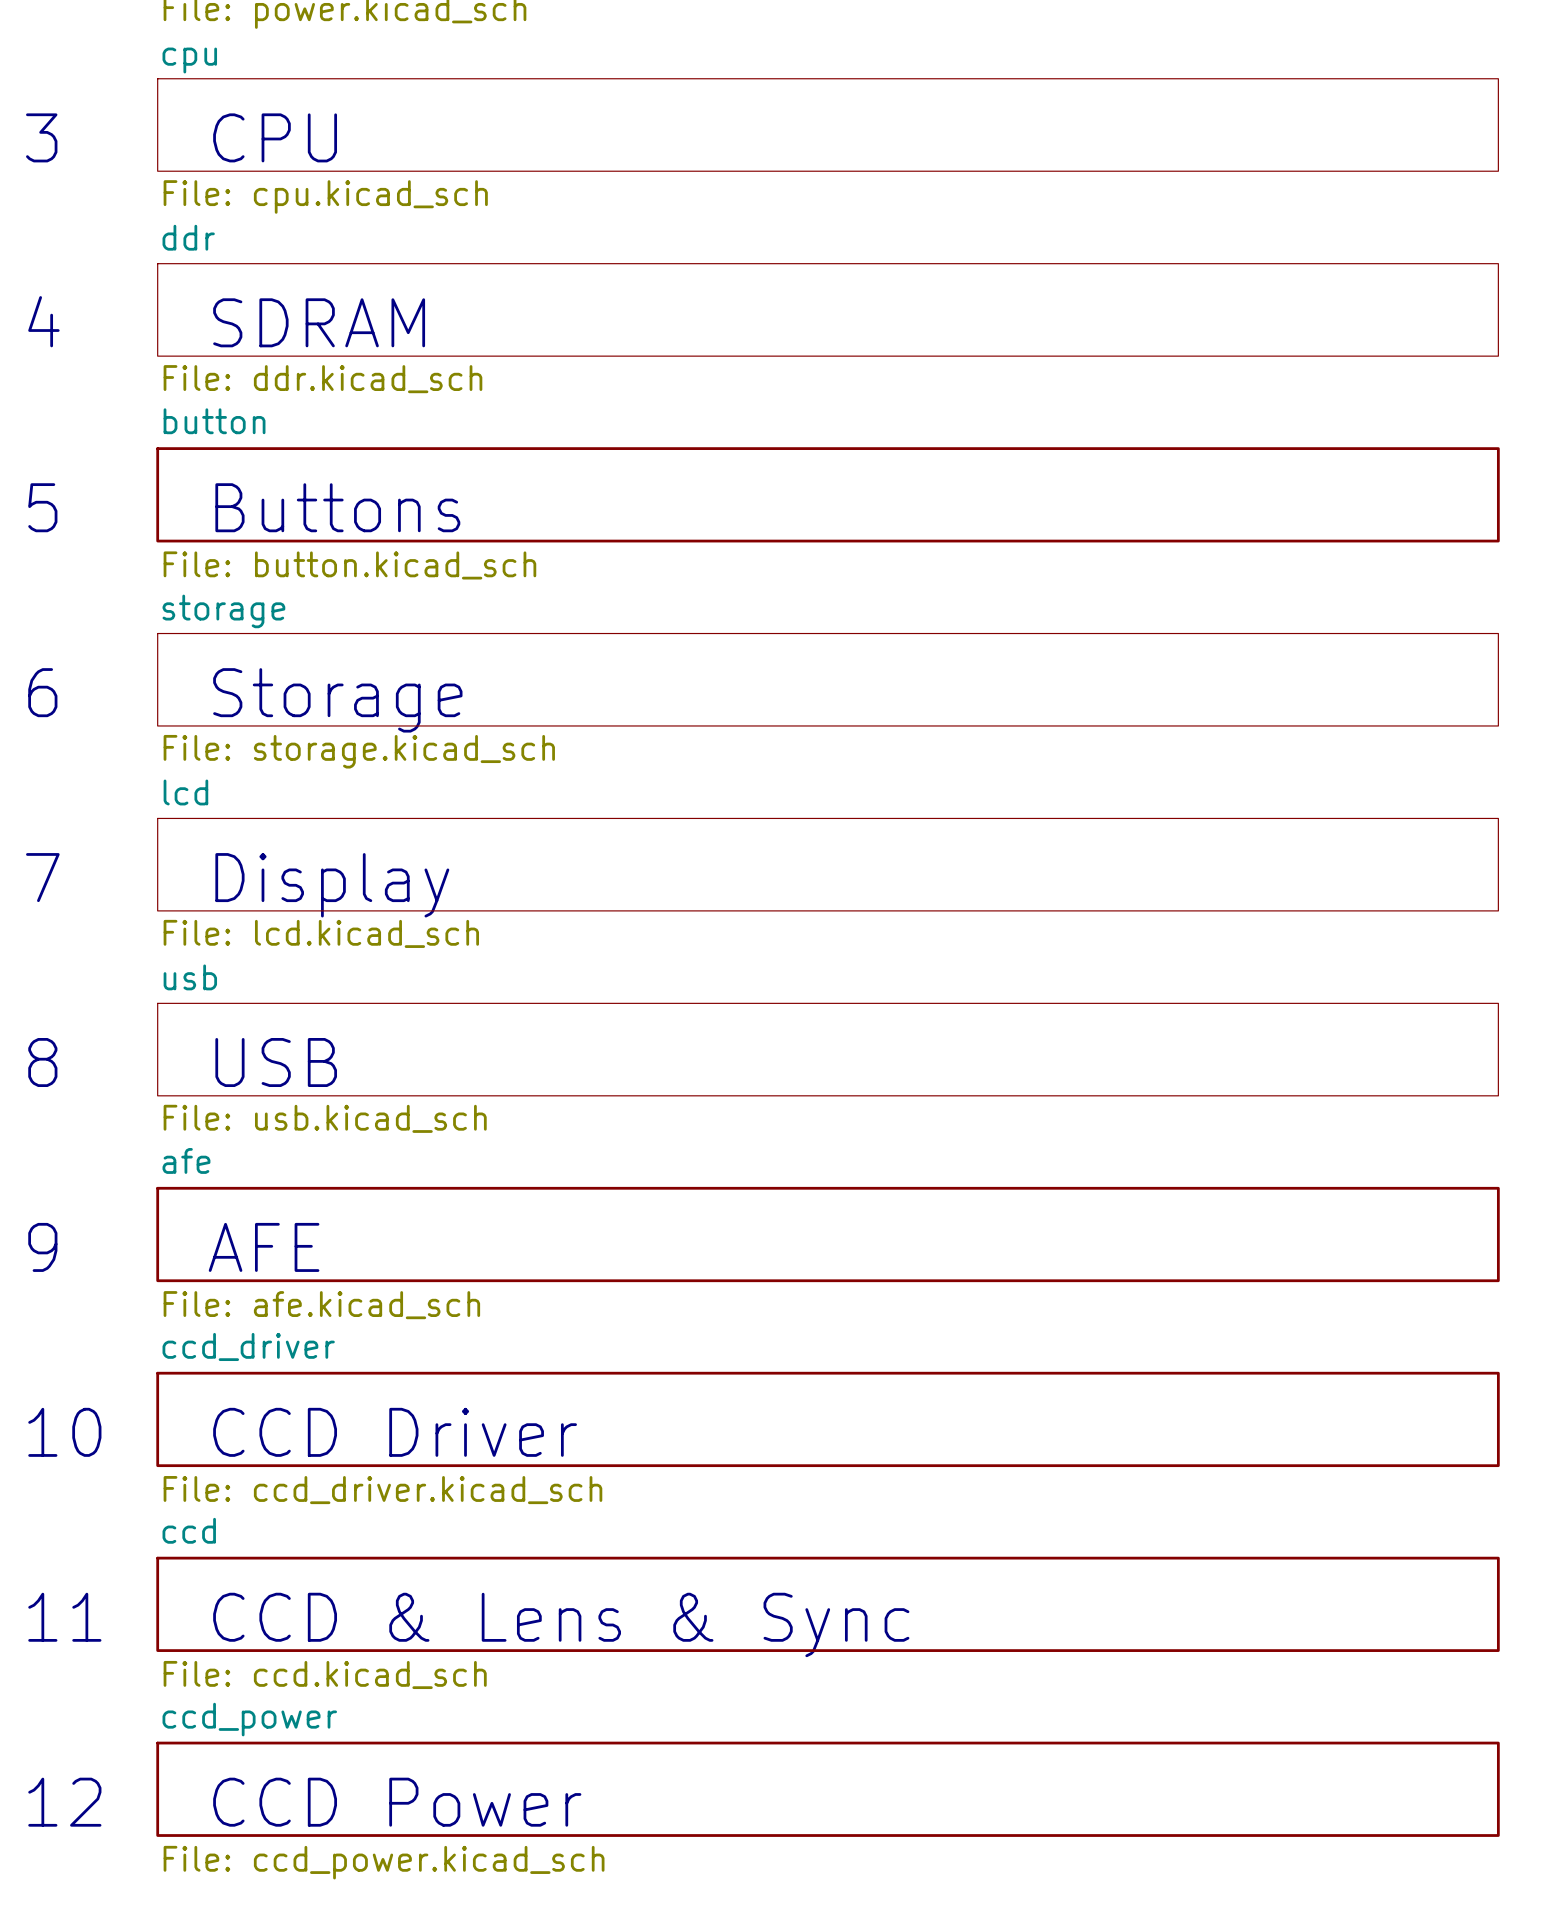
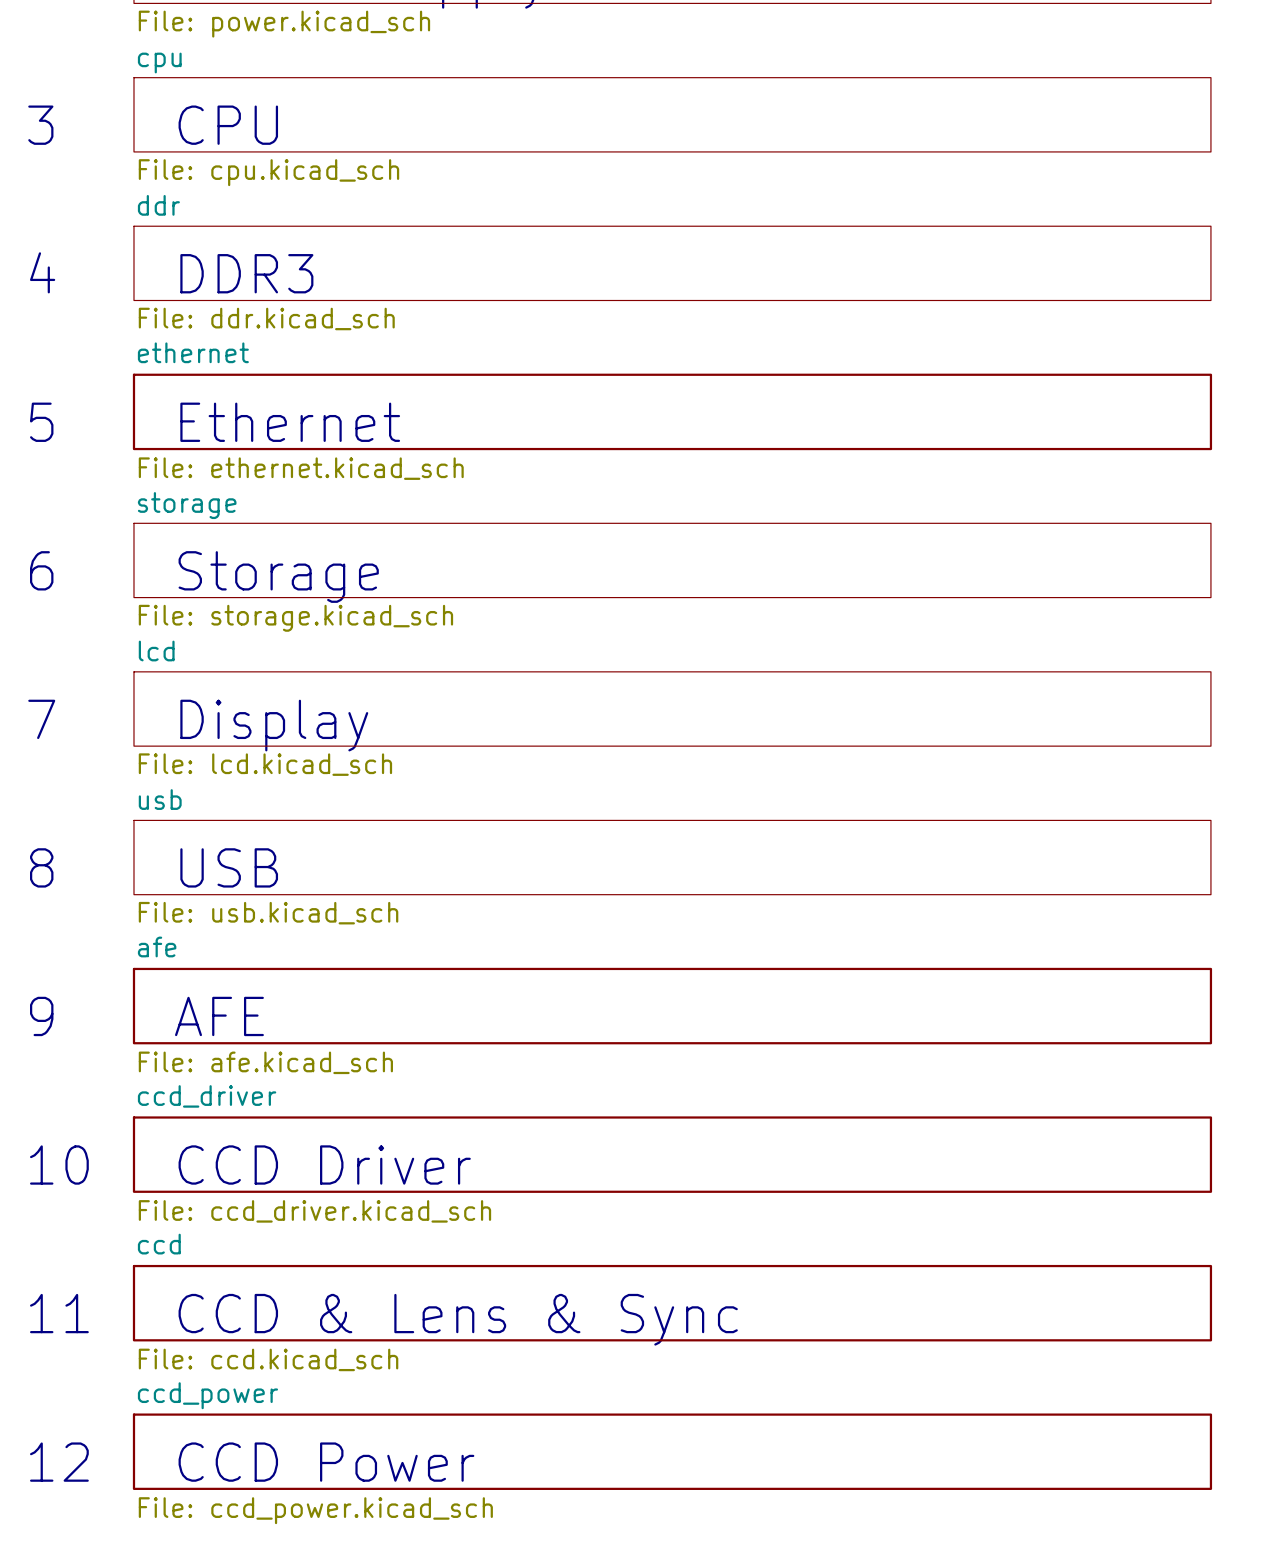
text: SDRAM (319, 322) -> DDR3 (246, 273)
sheet button name: button (214, 421) -> ethernet (193, 352)
text: Buttons (337, 507) -> Ethernet (290, 422)
sheet button value: File: button.kicad_sch (349, 565) -> File: ethernet.kicad_sch (301, 468)

